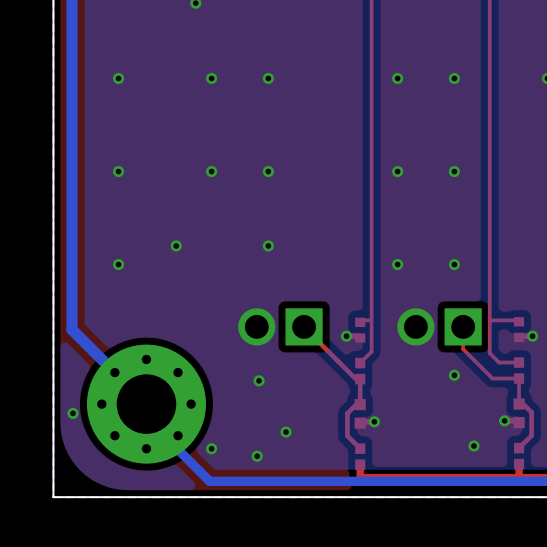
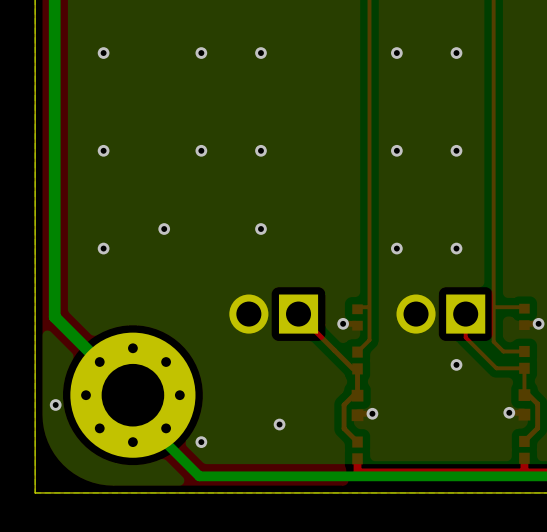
via: (259, 380) -> none
via: (473, 445) -> none
via: (257, 456) -> none

